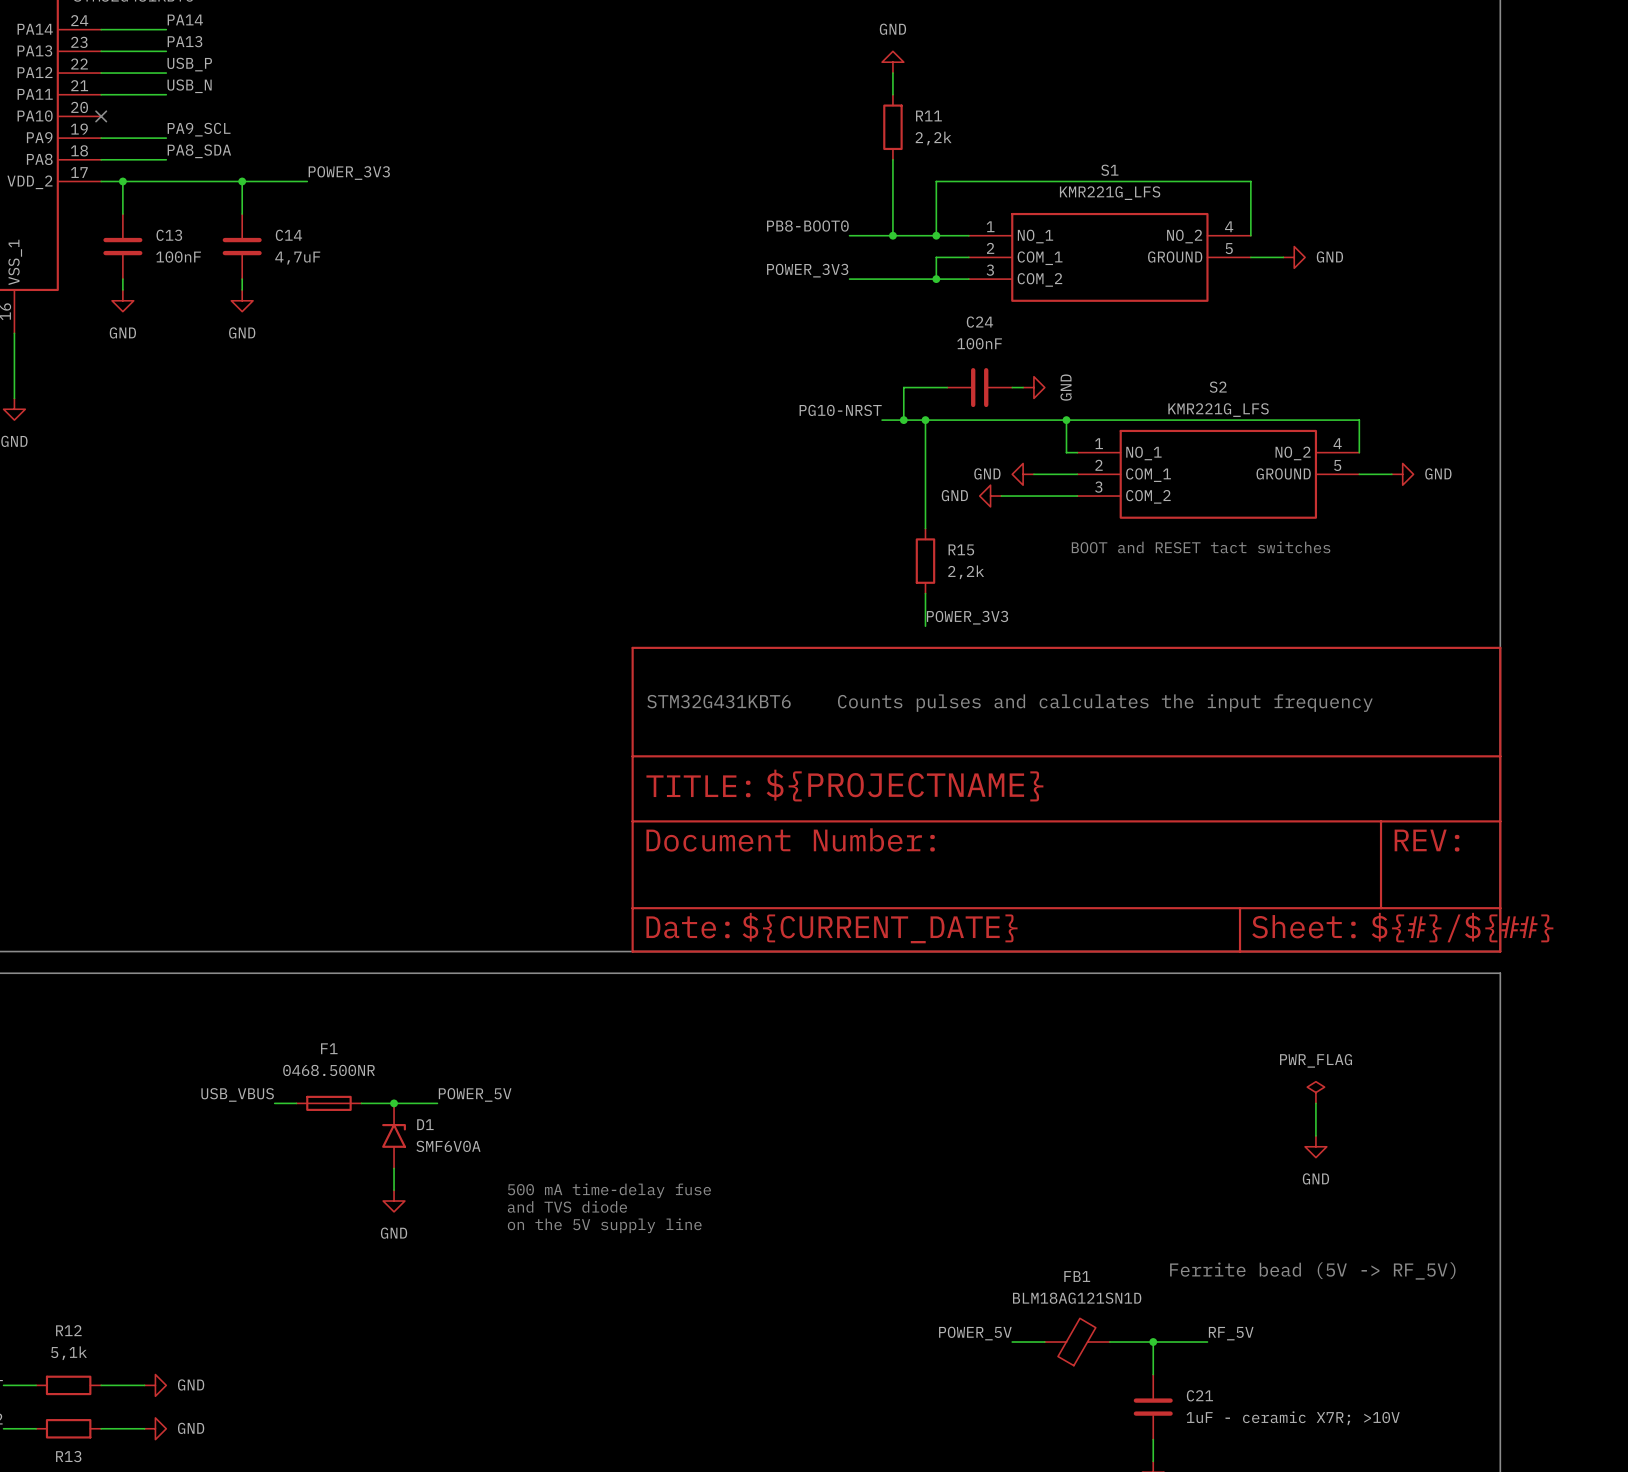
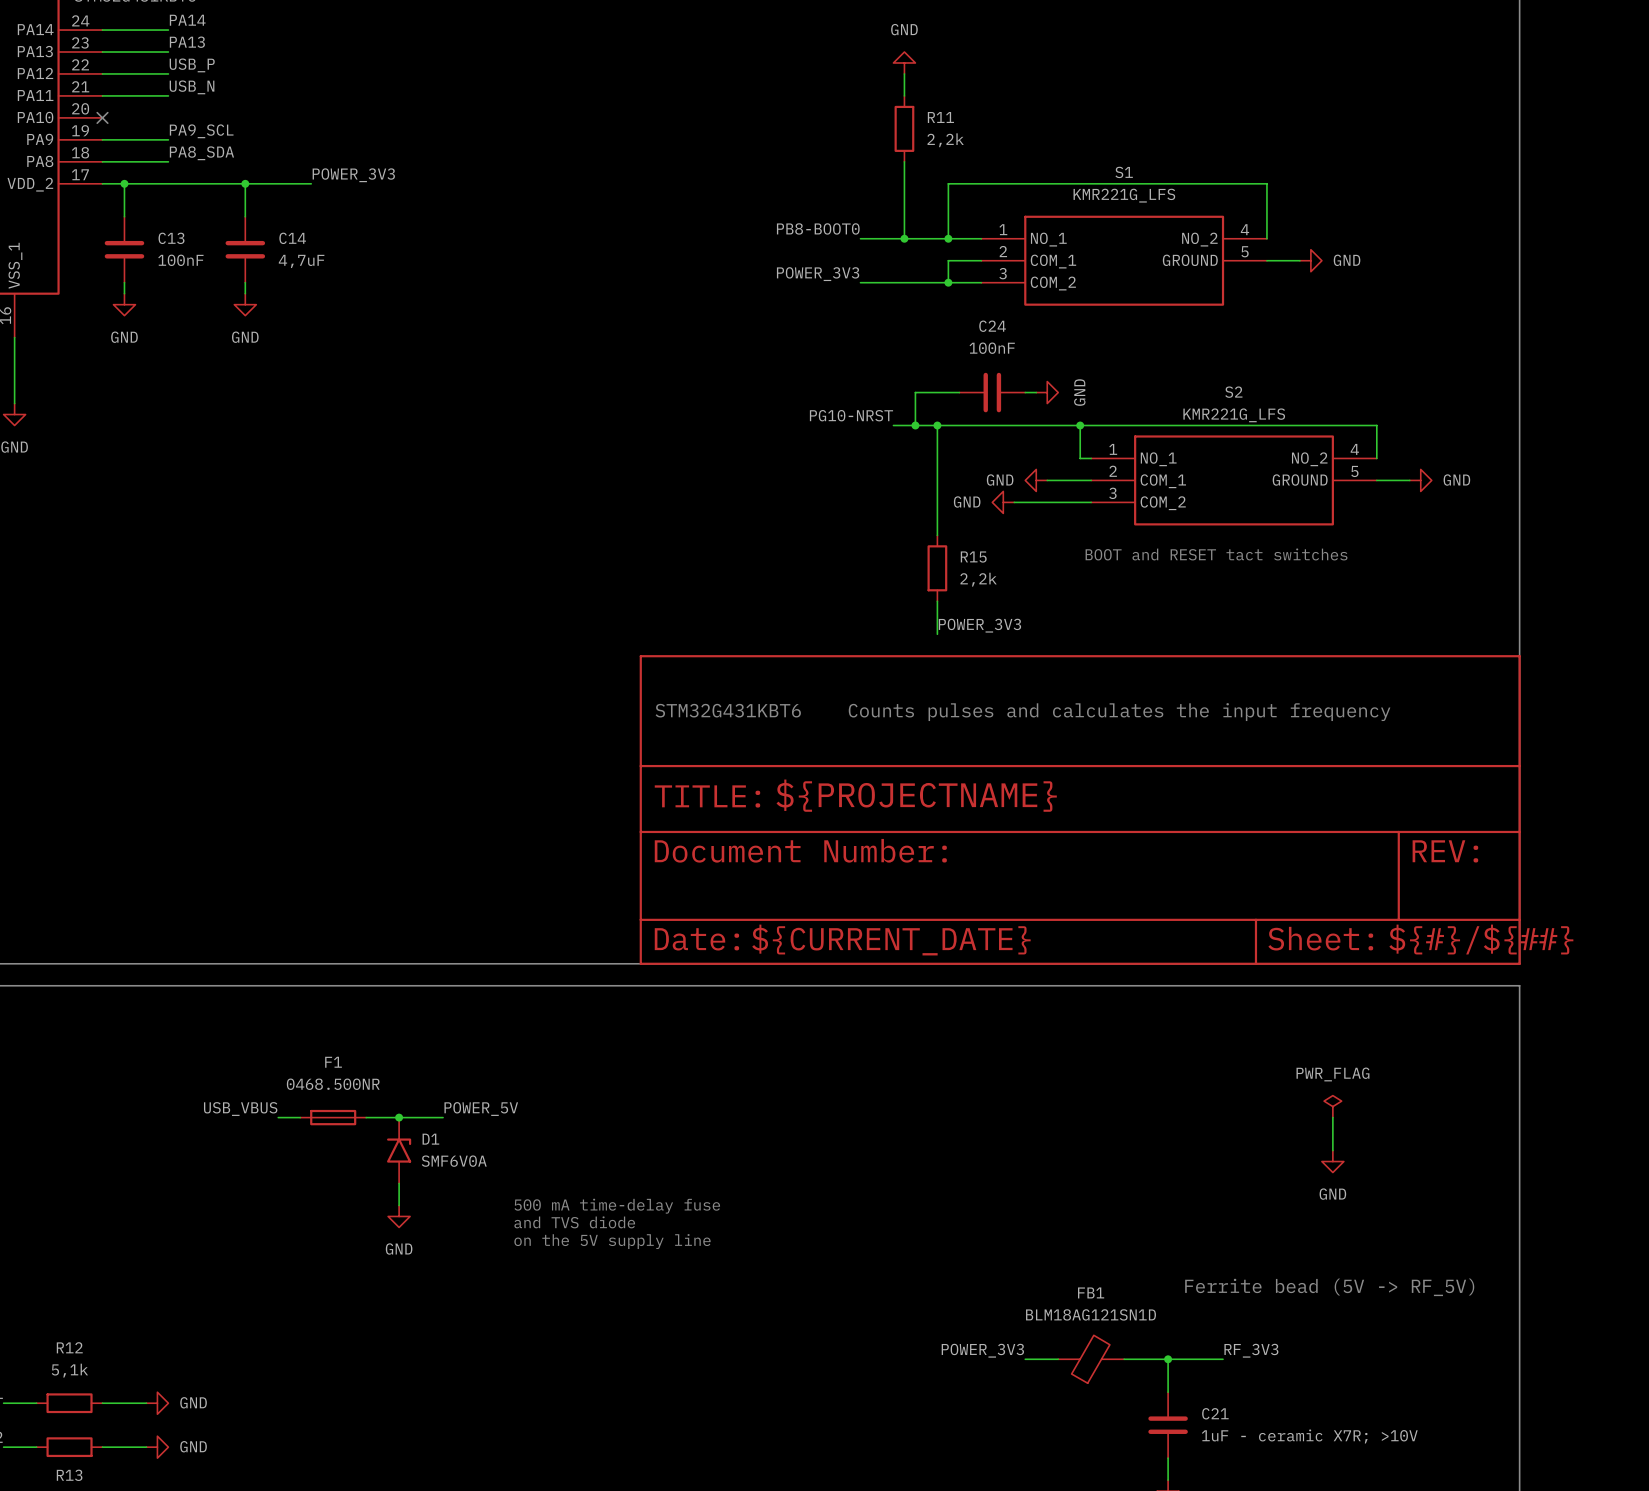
label: POWER_5V (975, 1333) -> POWER_3V3 (982, 1350)
label: RF_5V (1231, 1333) -> RF_3V3 (1251, 1350)

